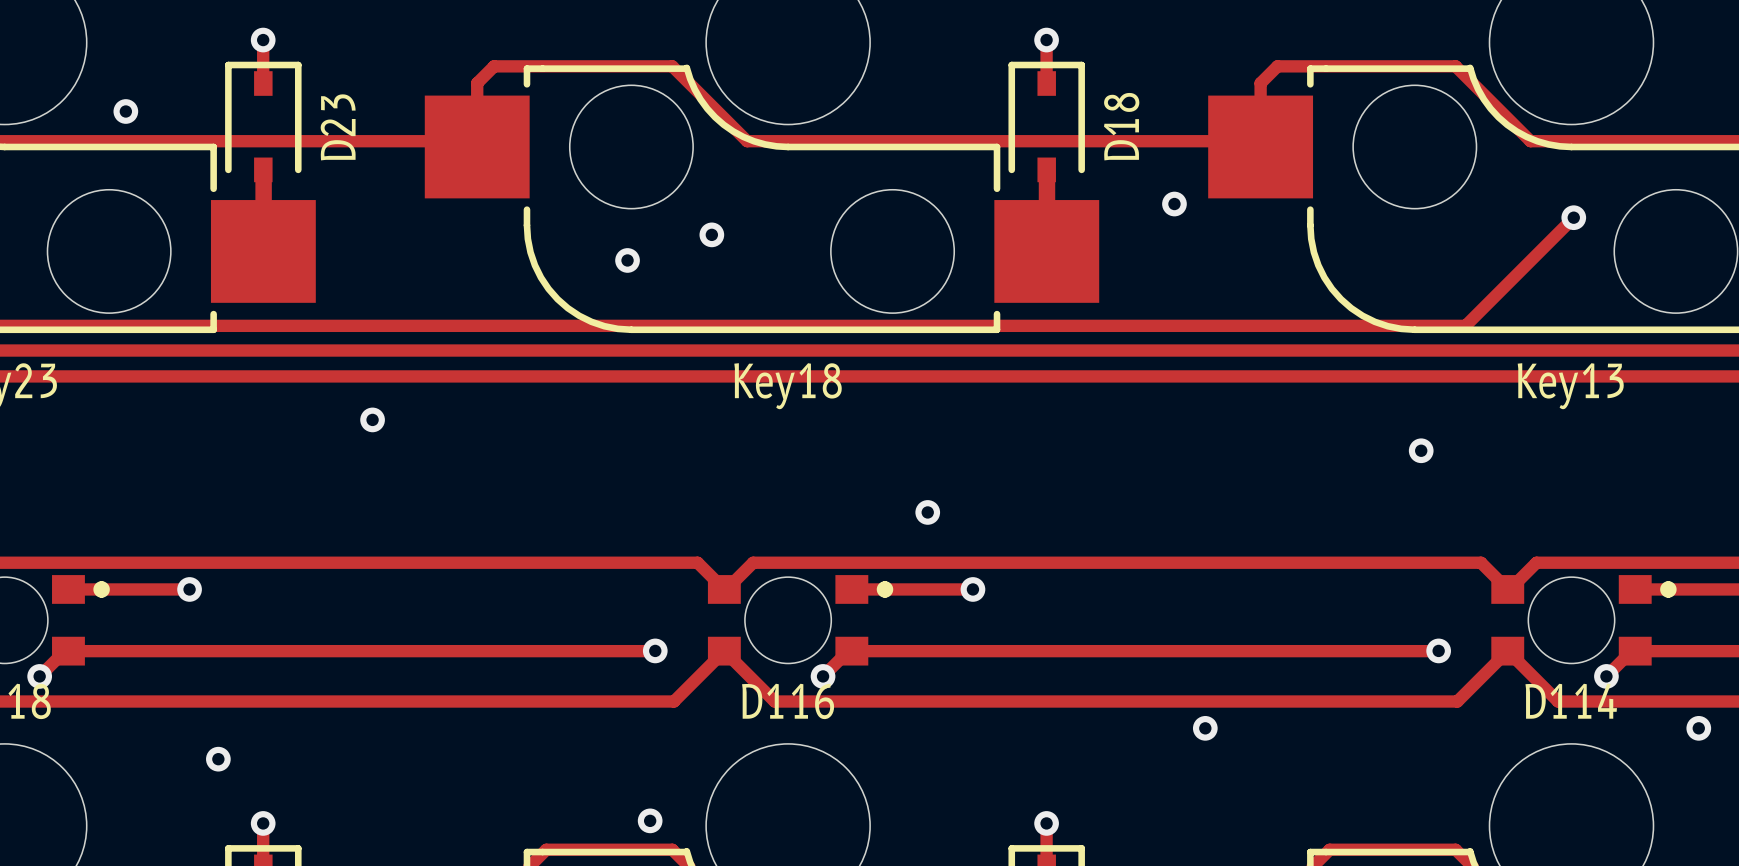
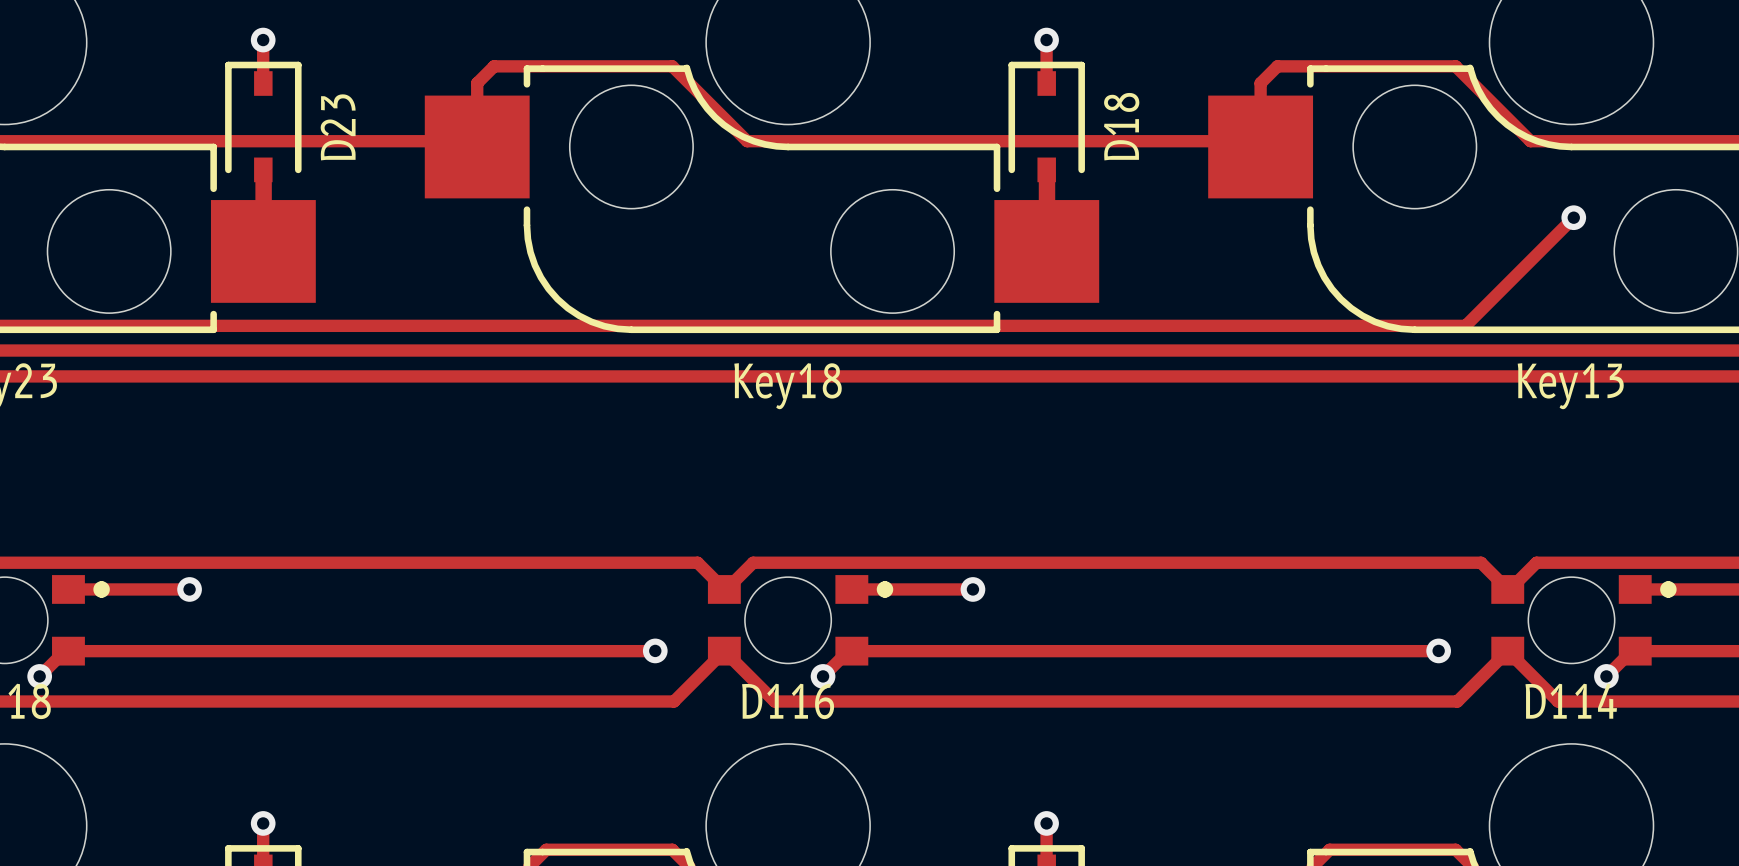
via: (125, 111) -> none
via: (1174, 204) -> none
via: (711, 234) -> none
via: (627, 260) -> none
via: (372, 419) -> none
via: (1421, 450) -> none
via: (927, 512) -> none
via: (1205, 728) -> none
via: (1698, 728) -> none
via: (218, 759) -> none
via: (650, 820) -> none

